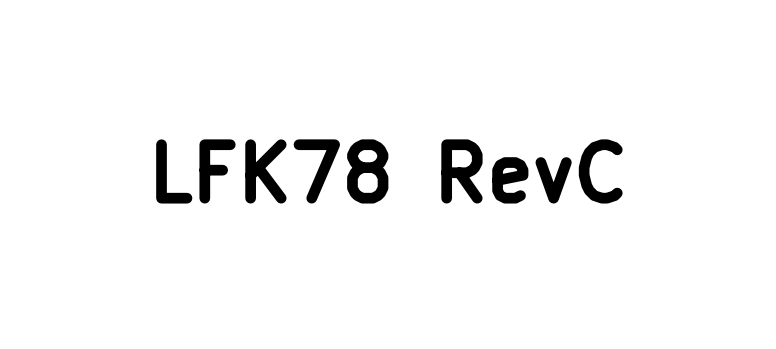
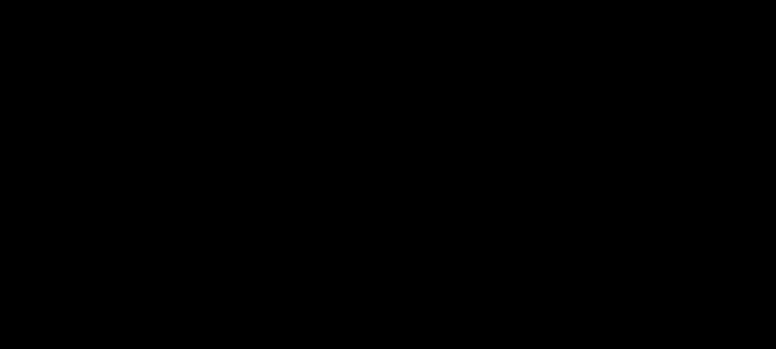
text: LFK78 RevC (389, 171) -> none

